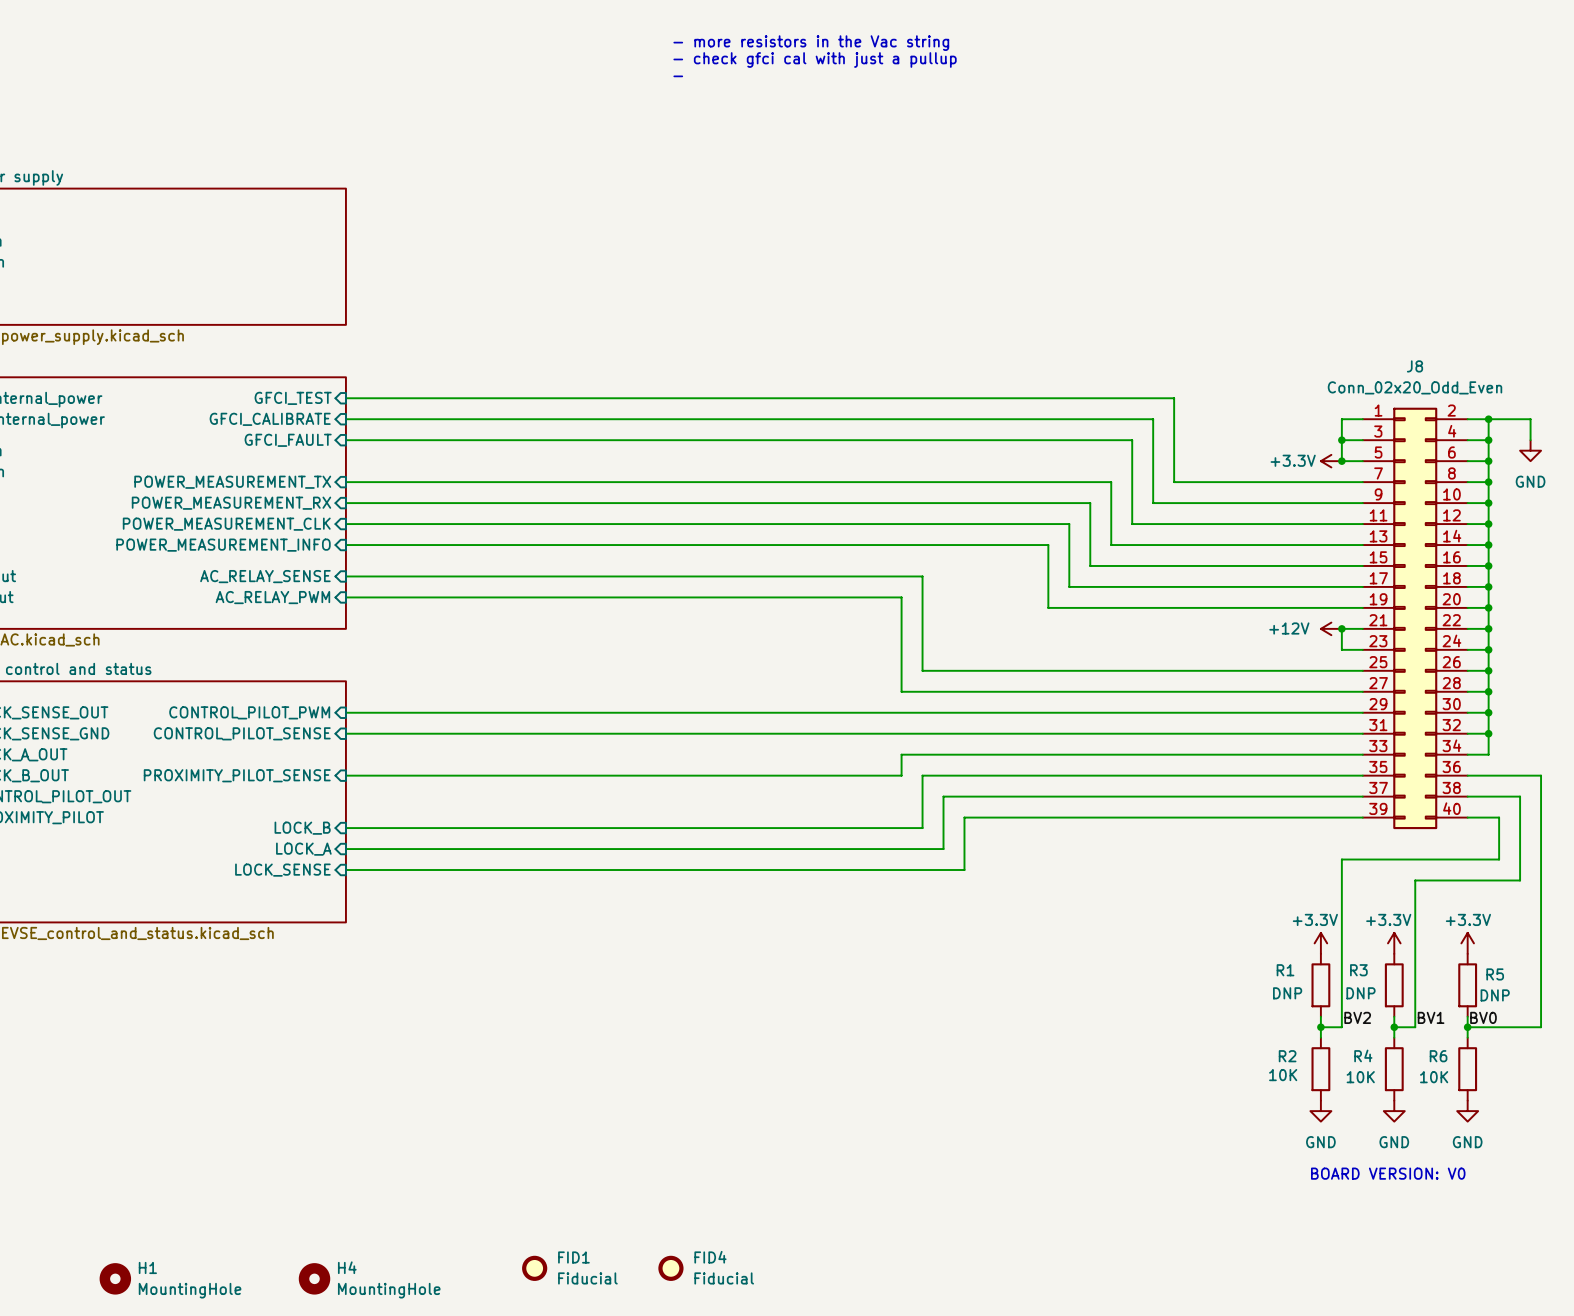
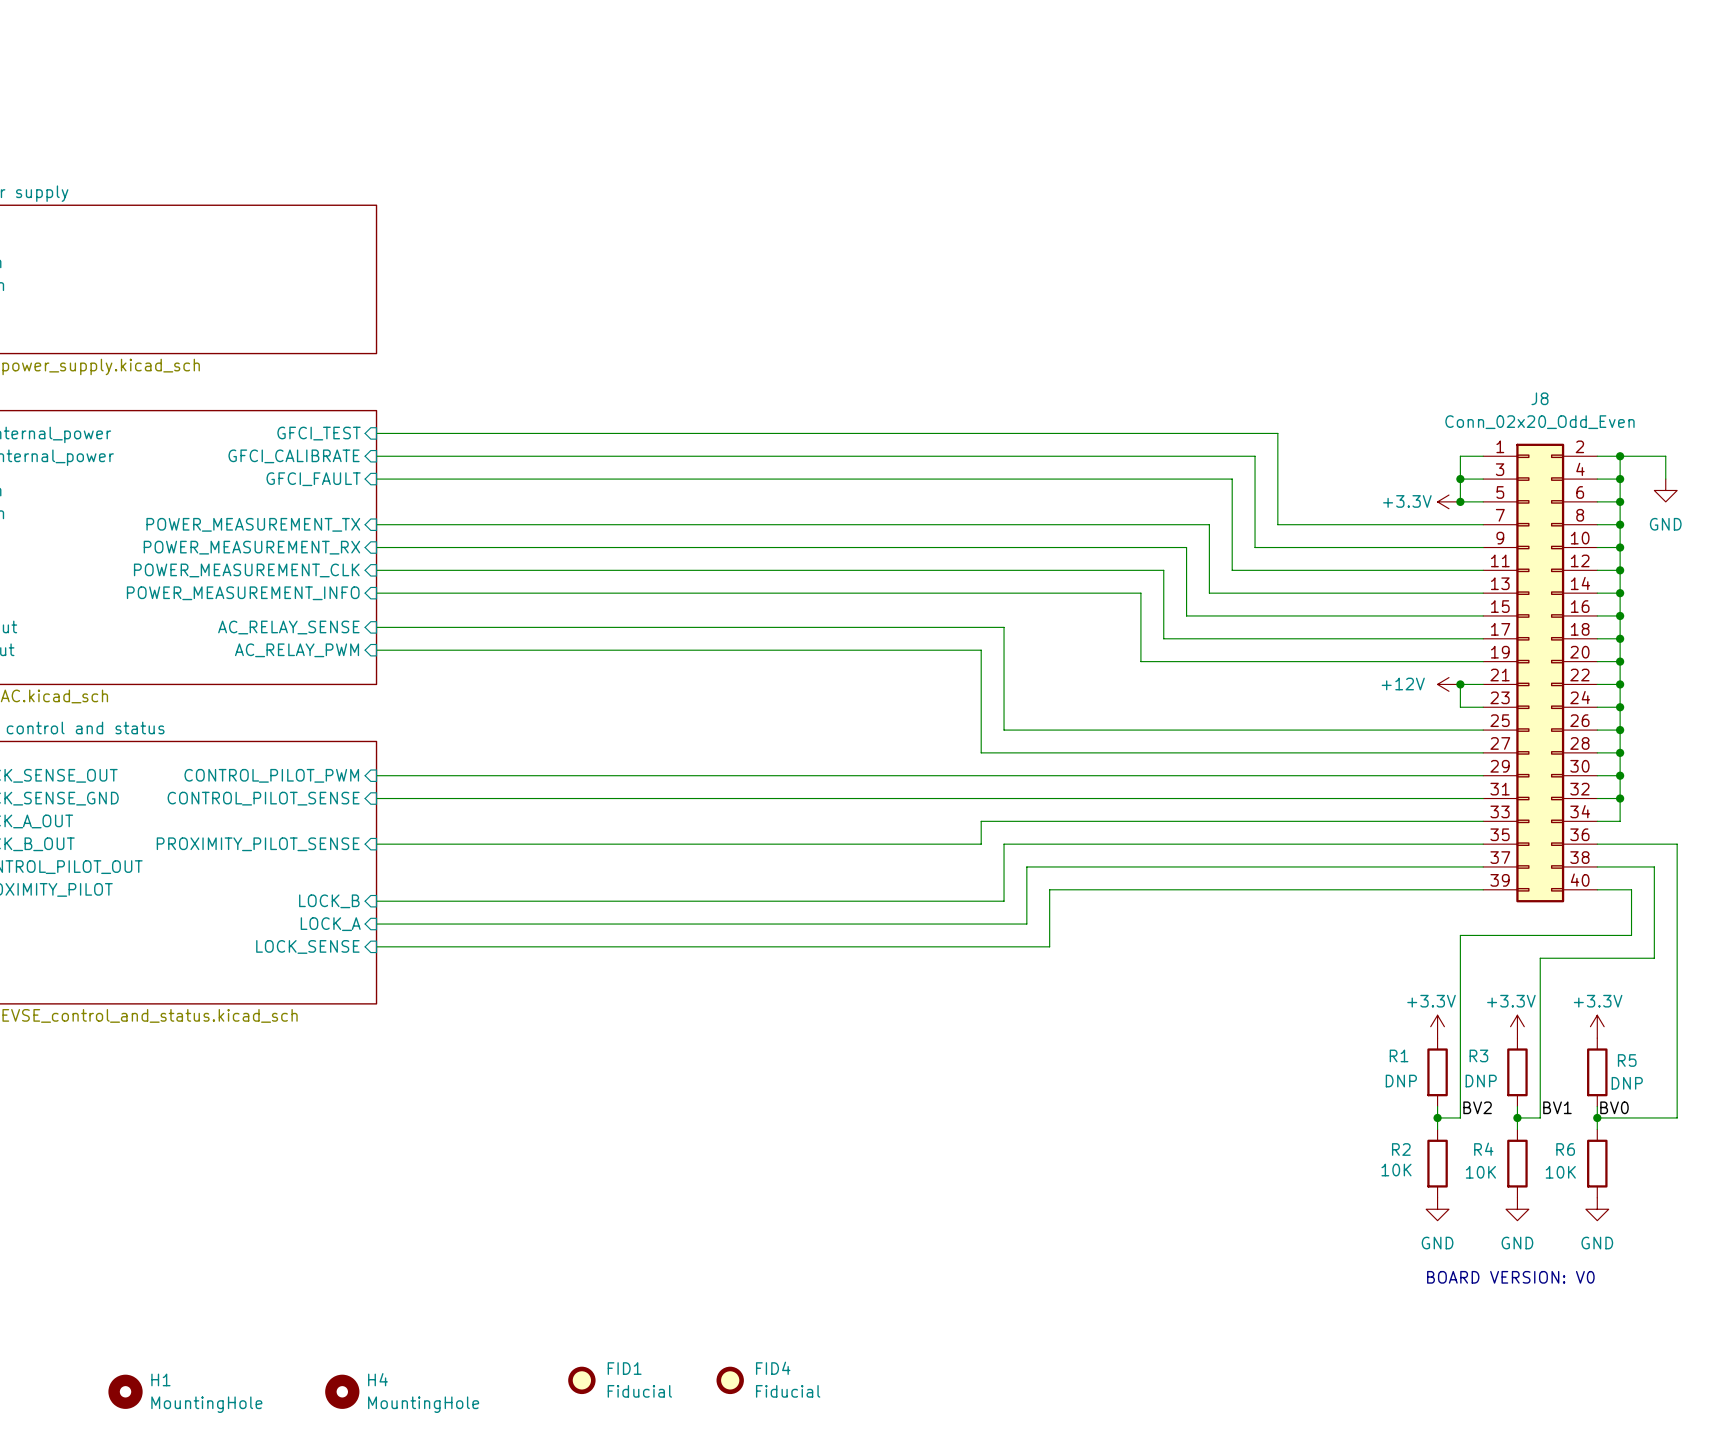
text: - more resistors in the Vac string (811, 43) -> none
text: - check gfci cal with just a pullup (815, 59) -> none
text: - (678, 76) -> none

